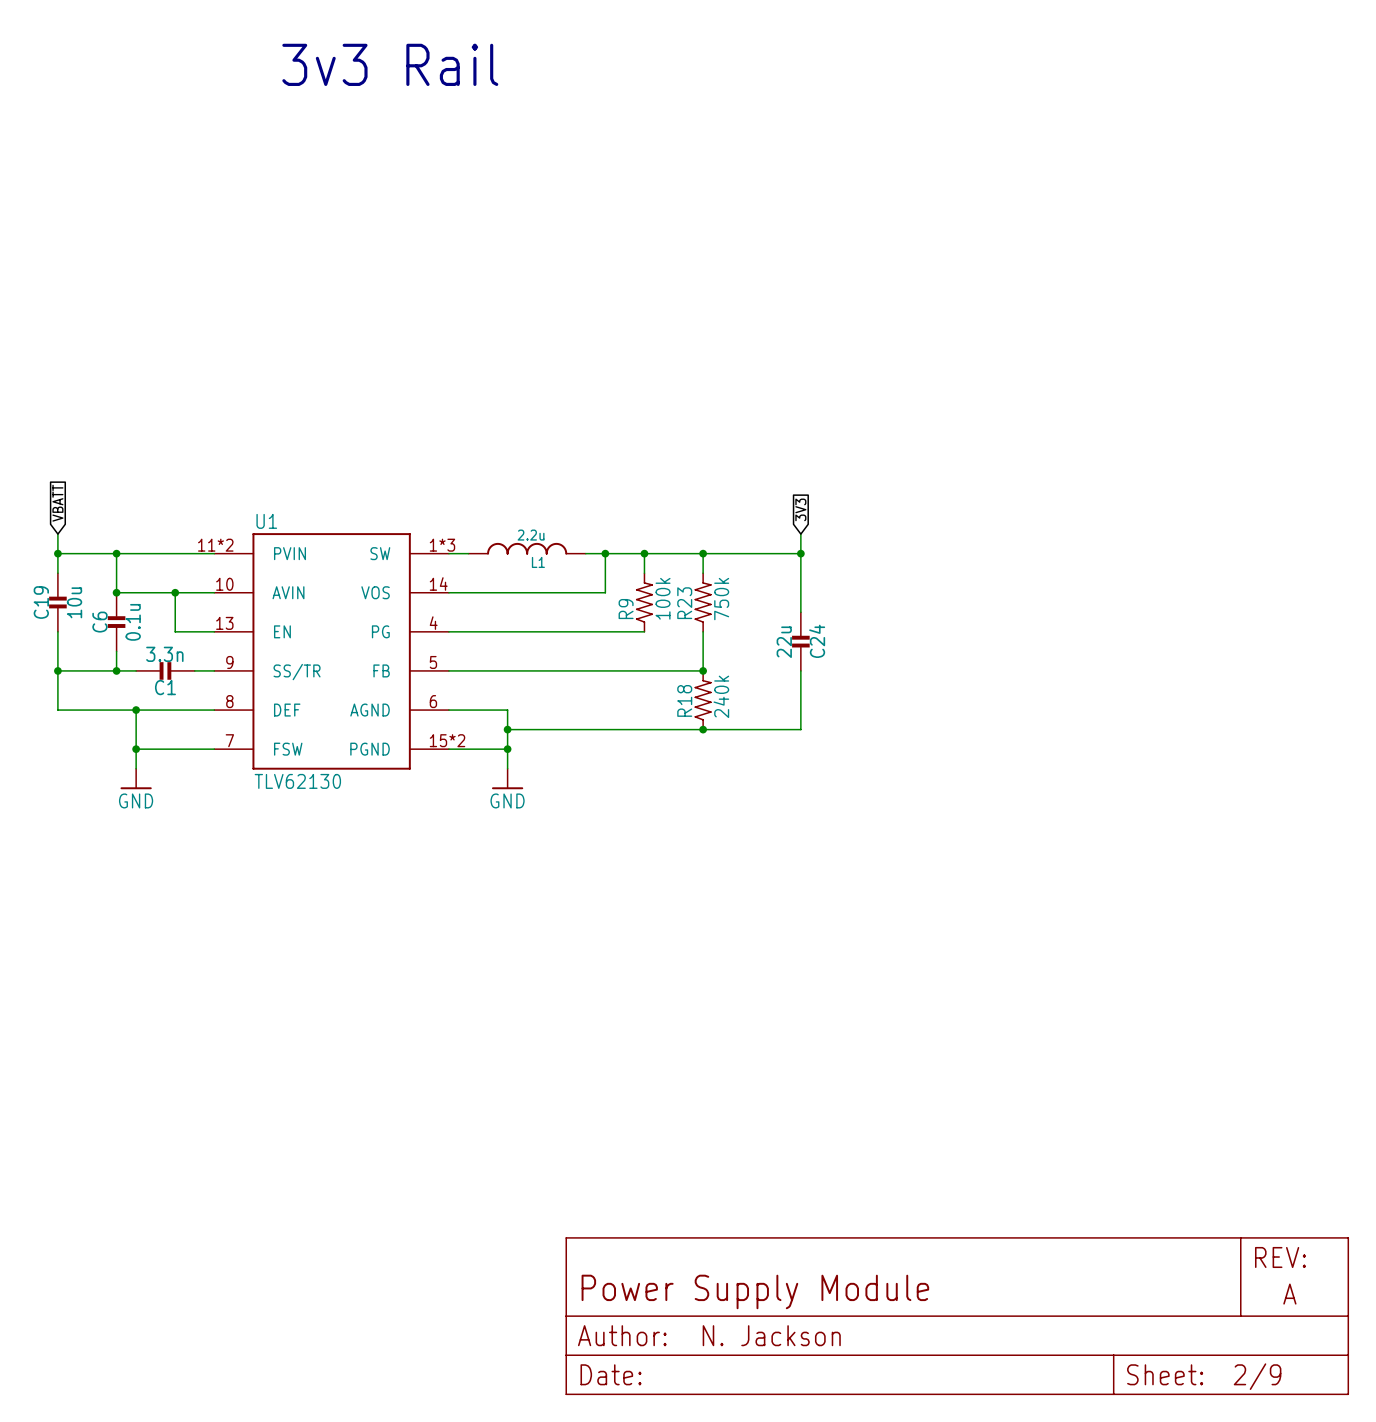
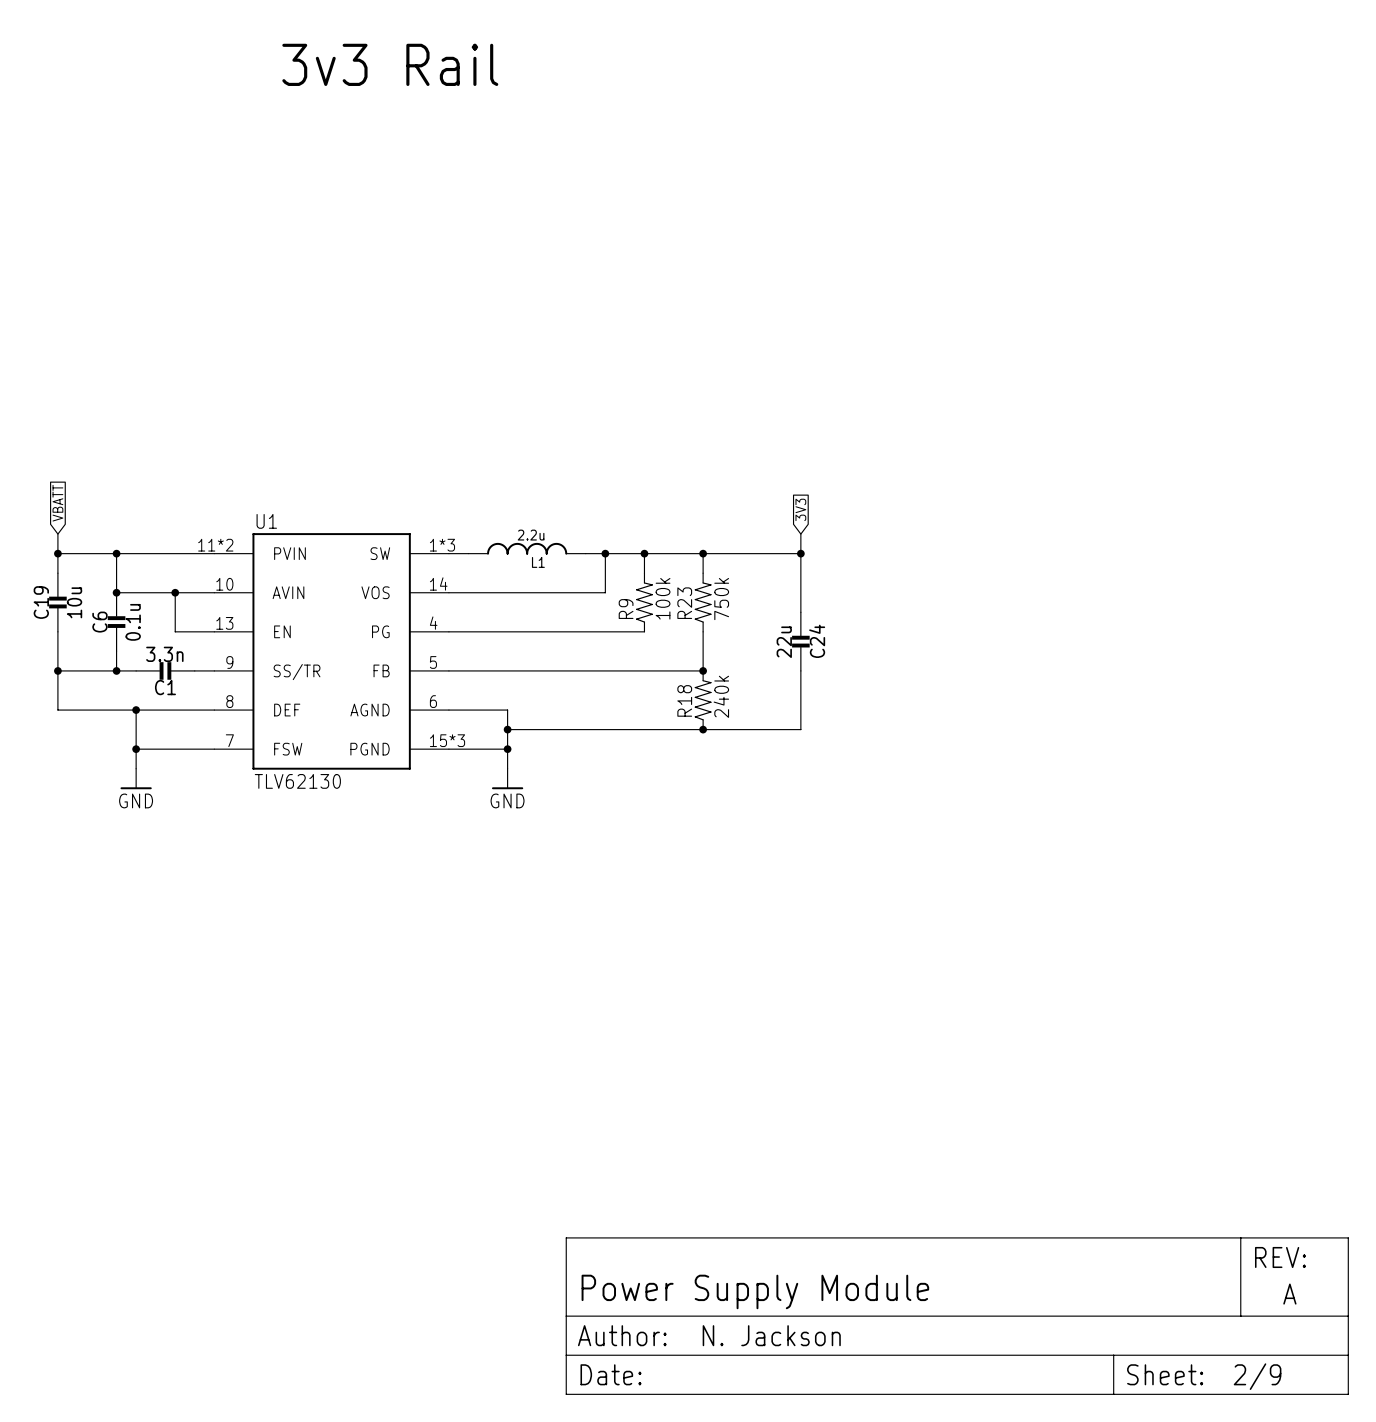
U1 pin number: 15*2 (447, 740) -> 15*3 (447, 740)

